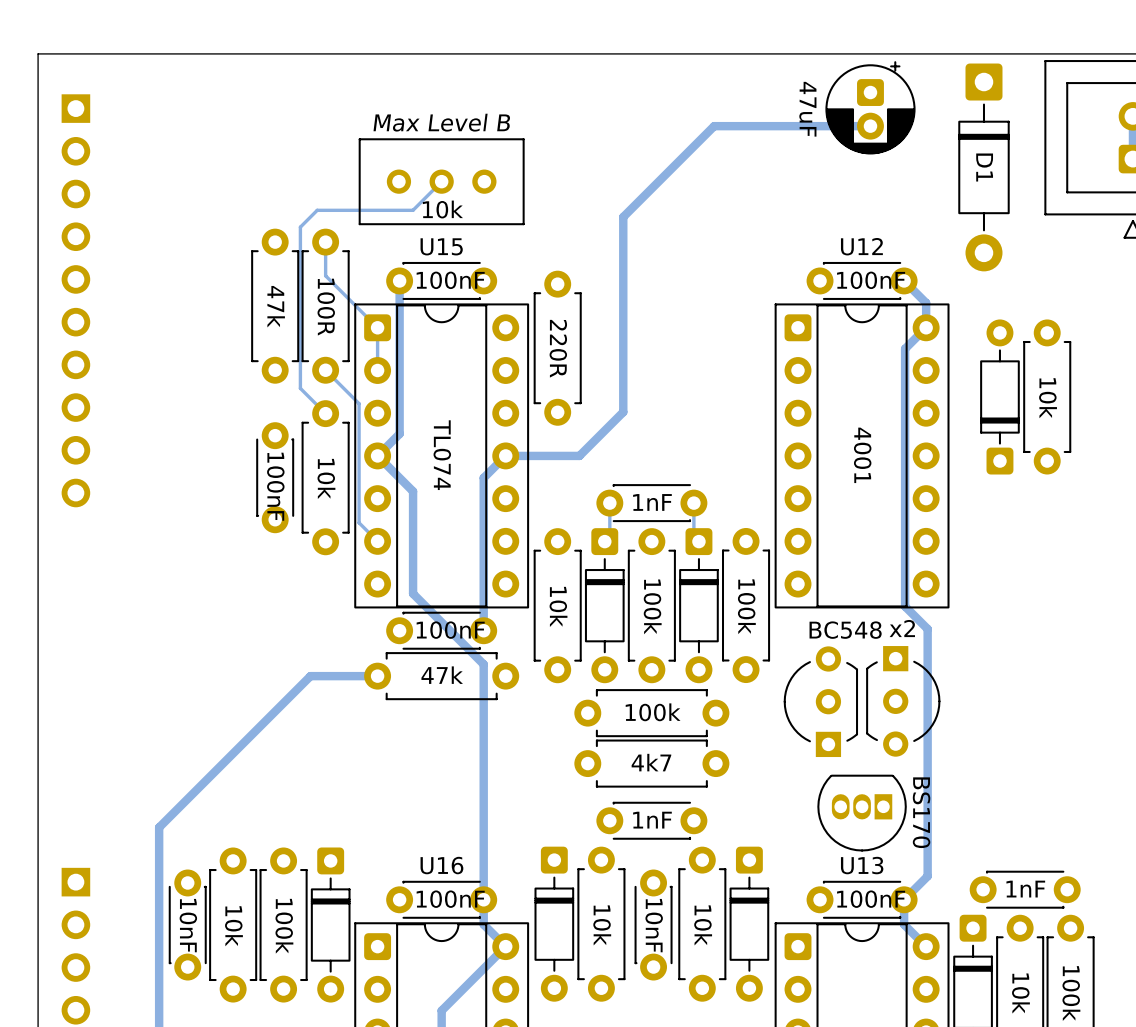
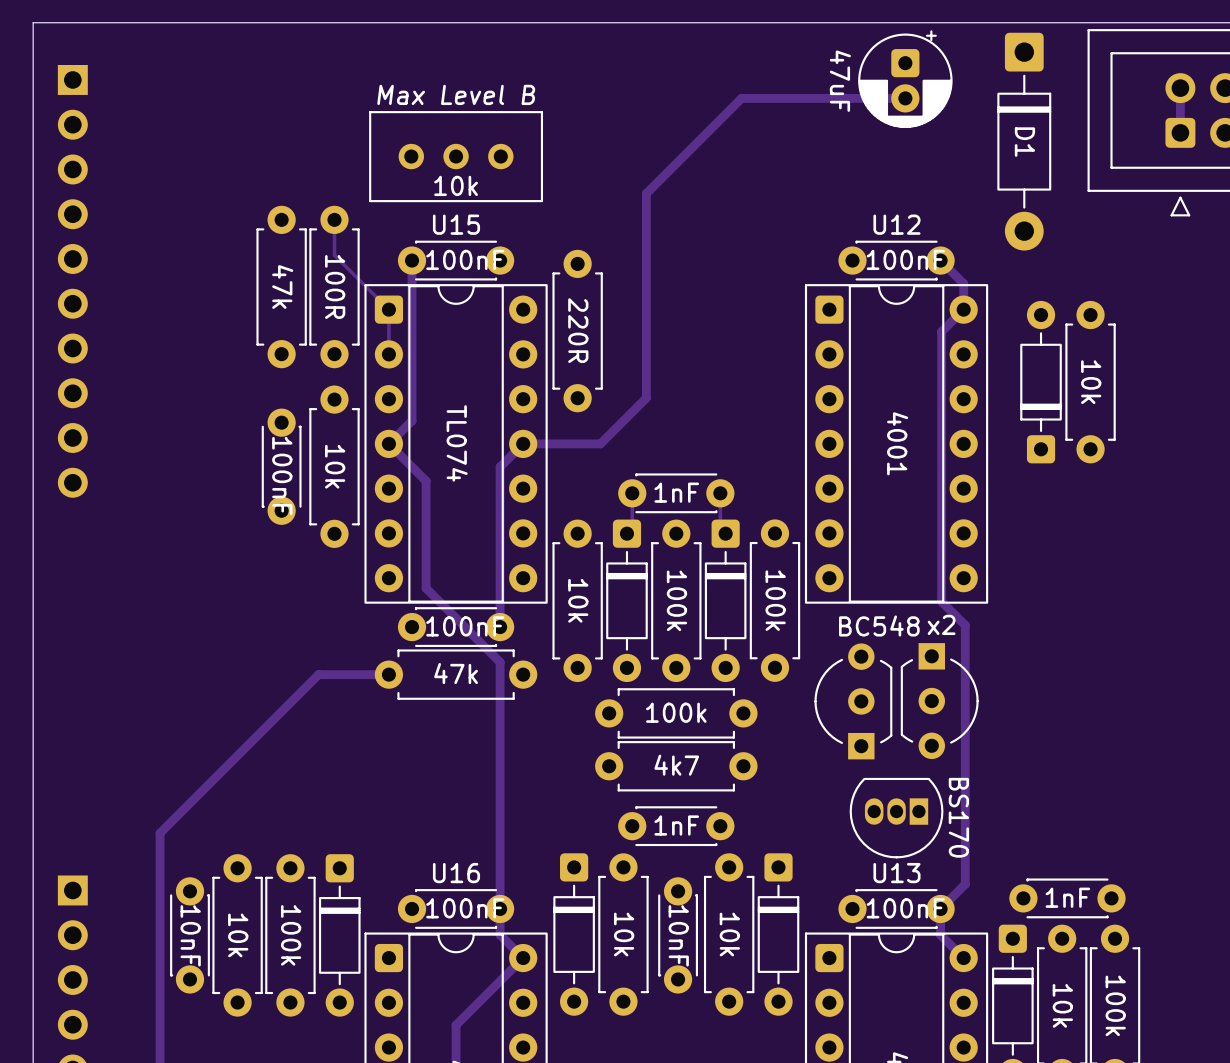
track: (441, 181) (412, 210) (317, 210) (300, 227) (300, 388) (325, 413) -> none
track: (325, 370) (359, 403) (359, 522) (377, 541) -> none

